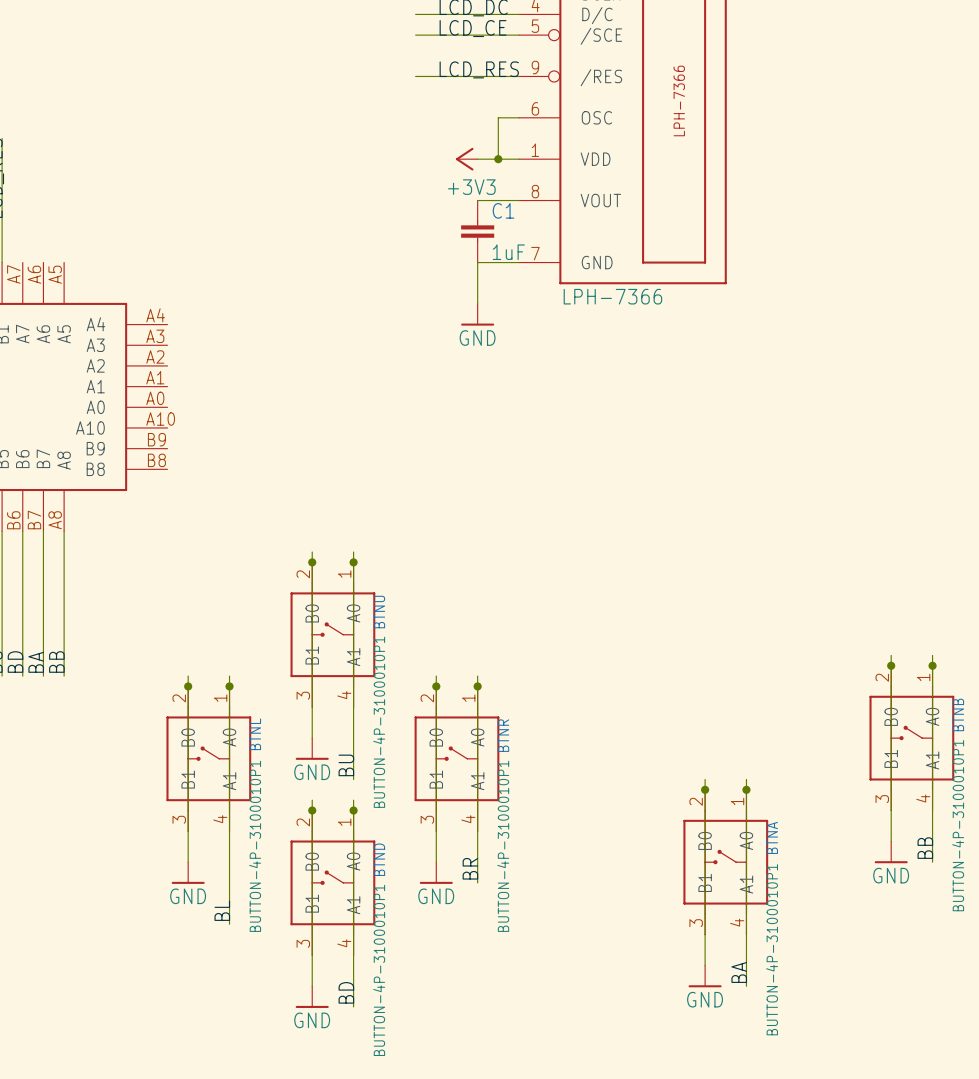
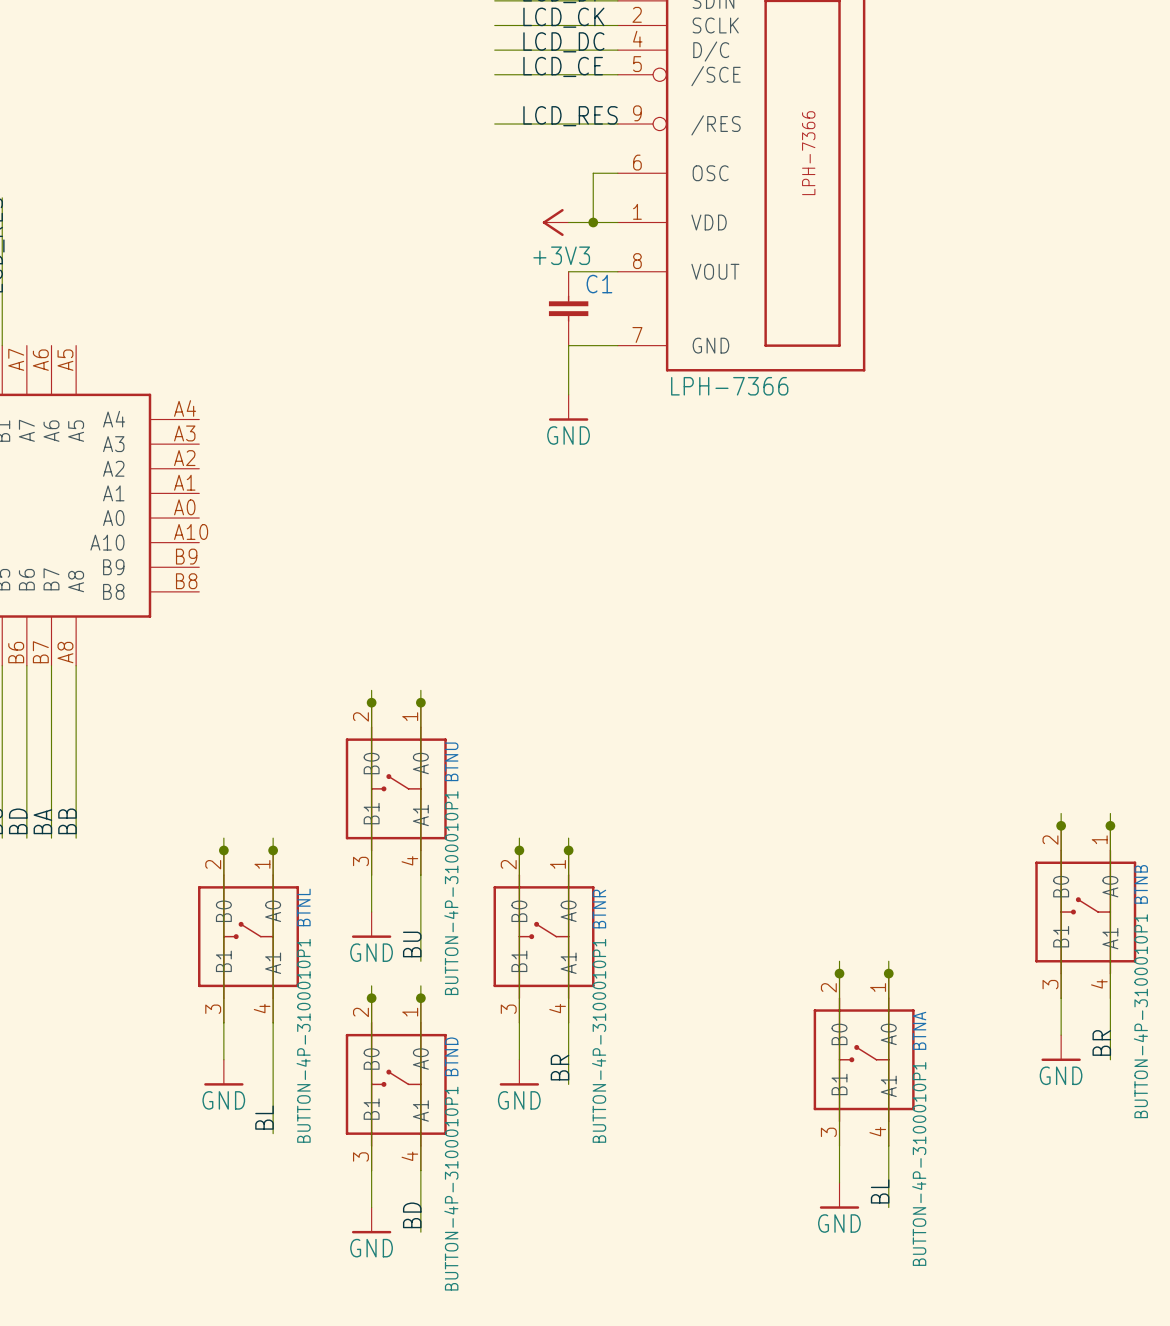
C1 value: 1uF (508, 252) -> none
label: BB (925, 848) -> BR (1101, 1042)
label: BA (739, 972) -> BL (880, 1191)

